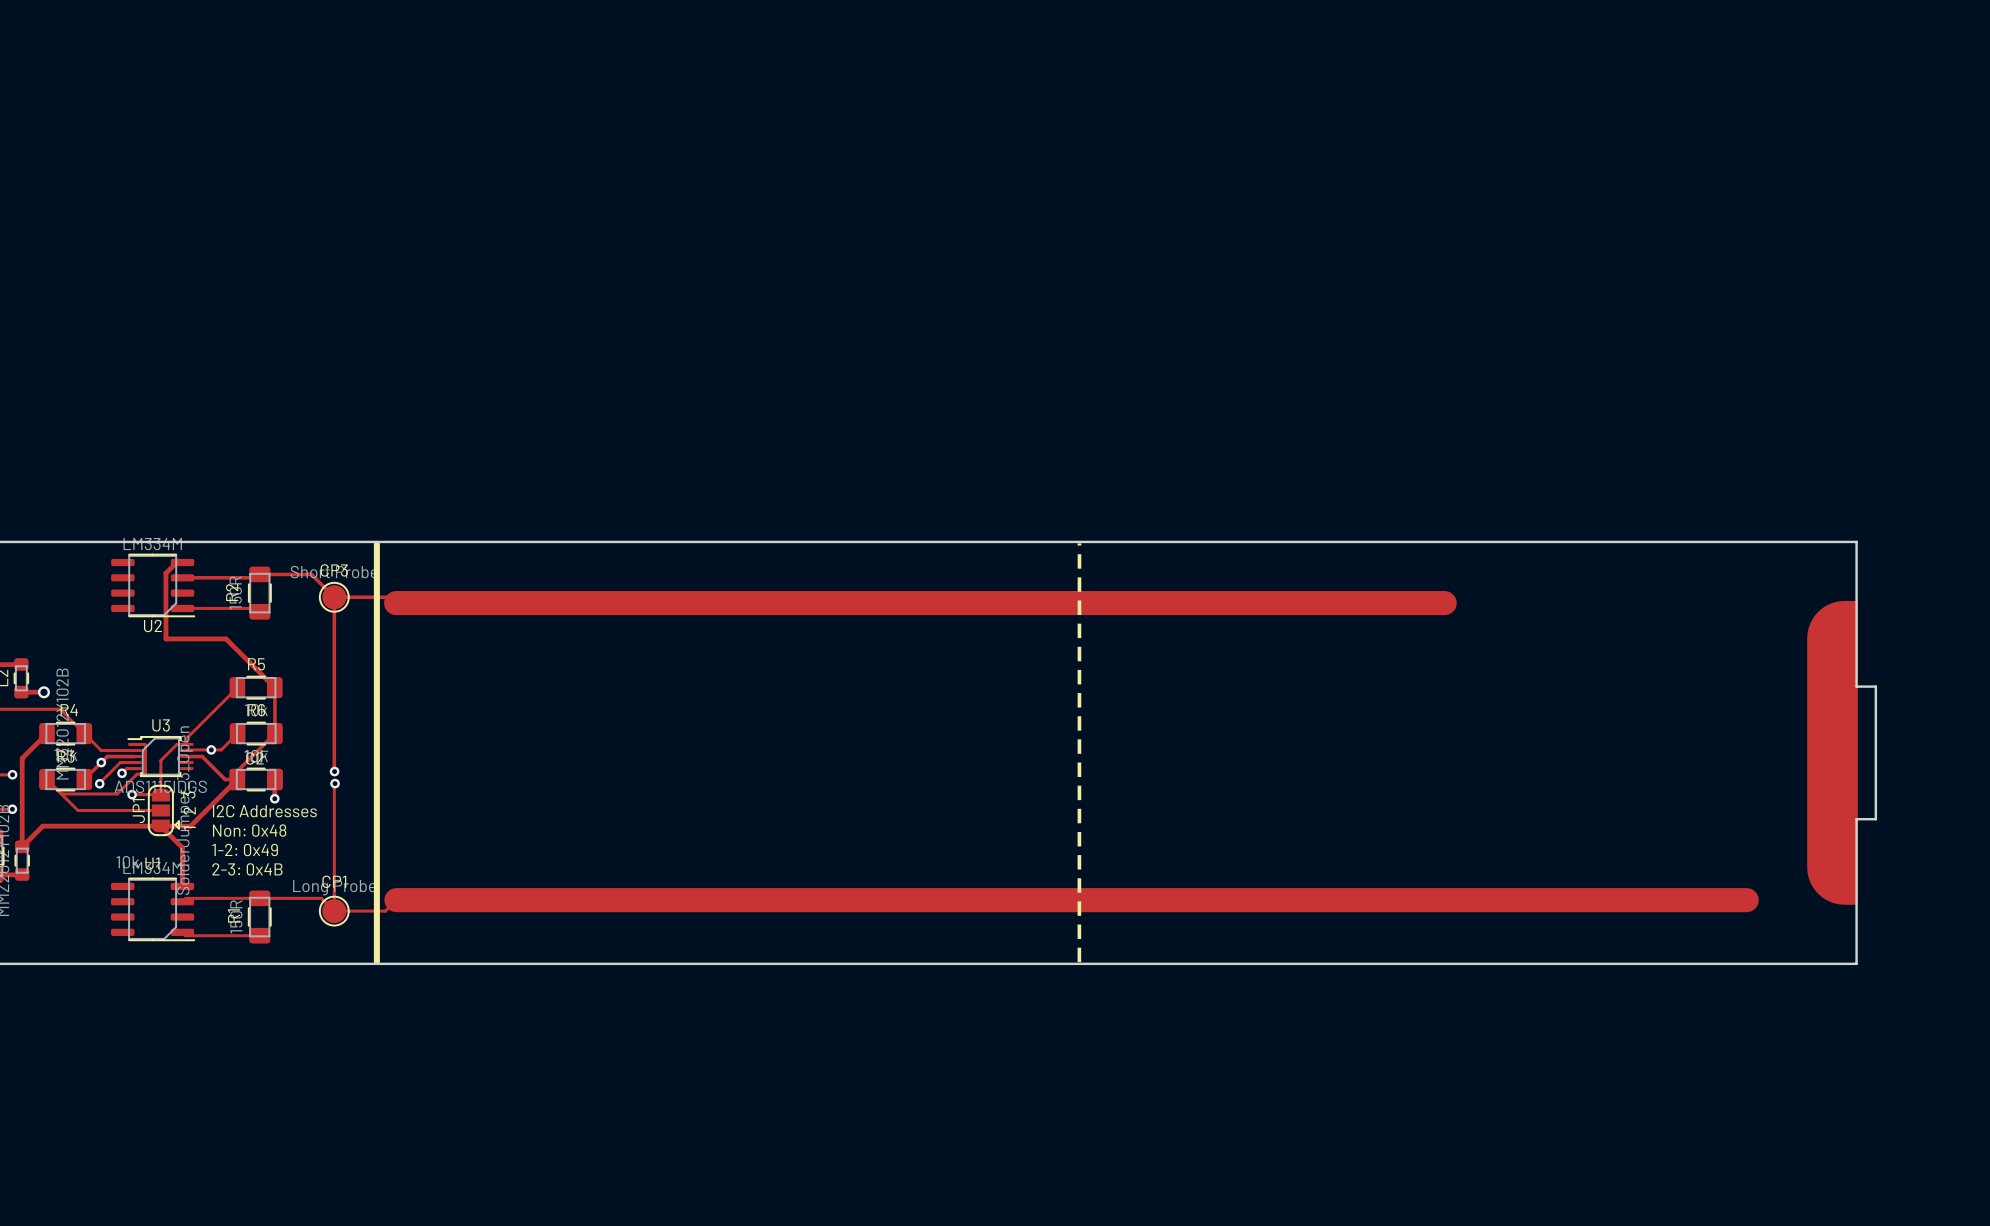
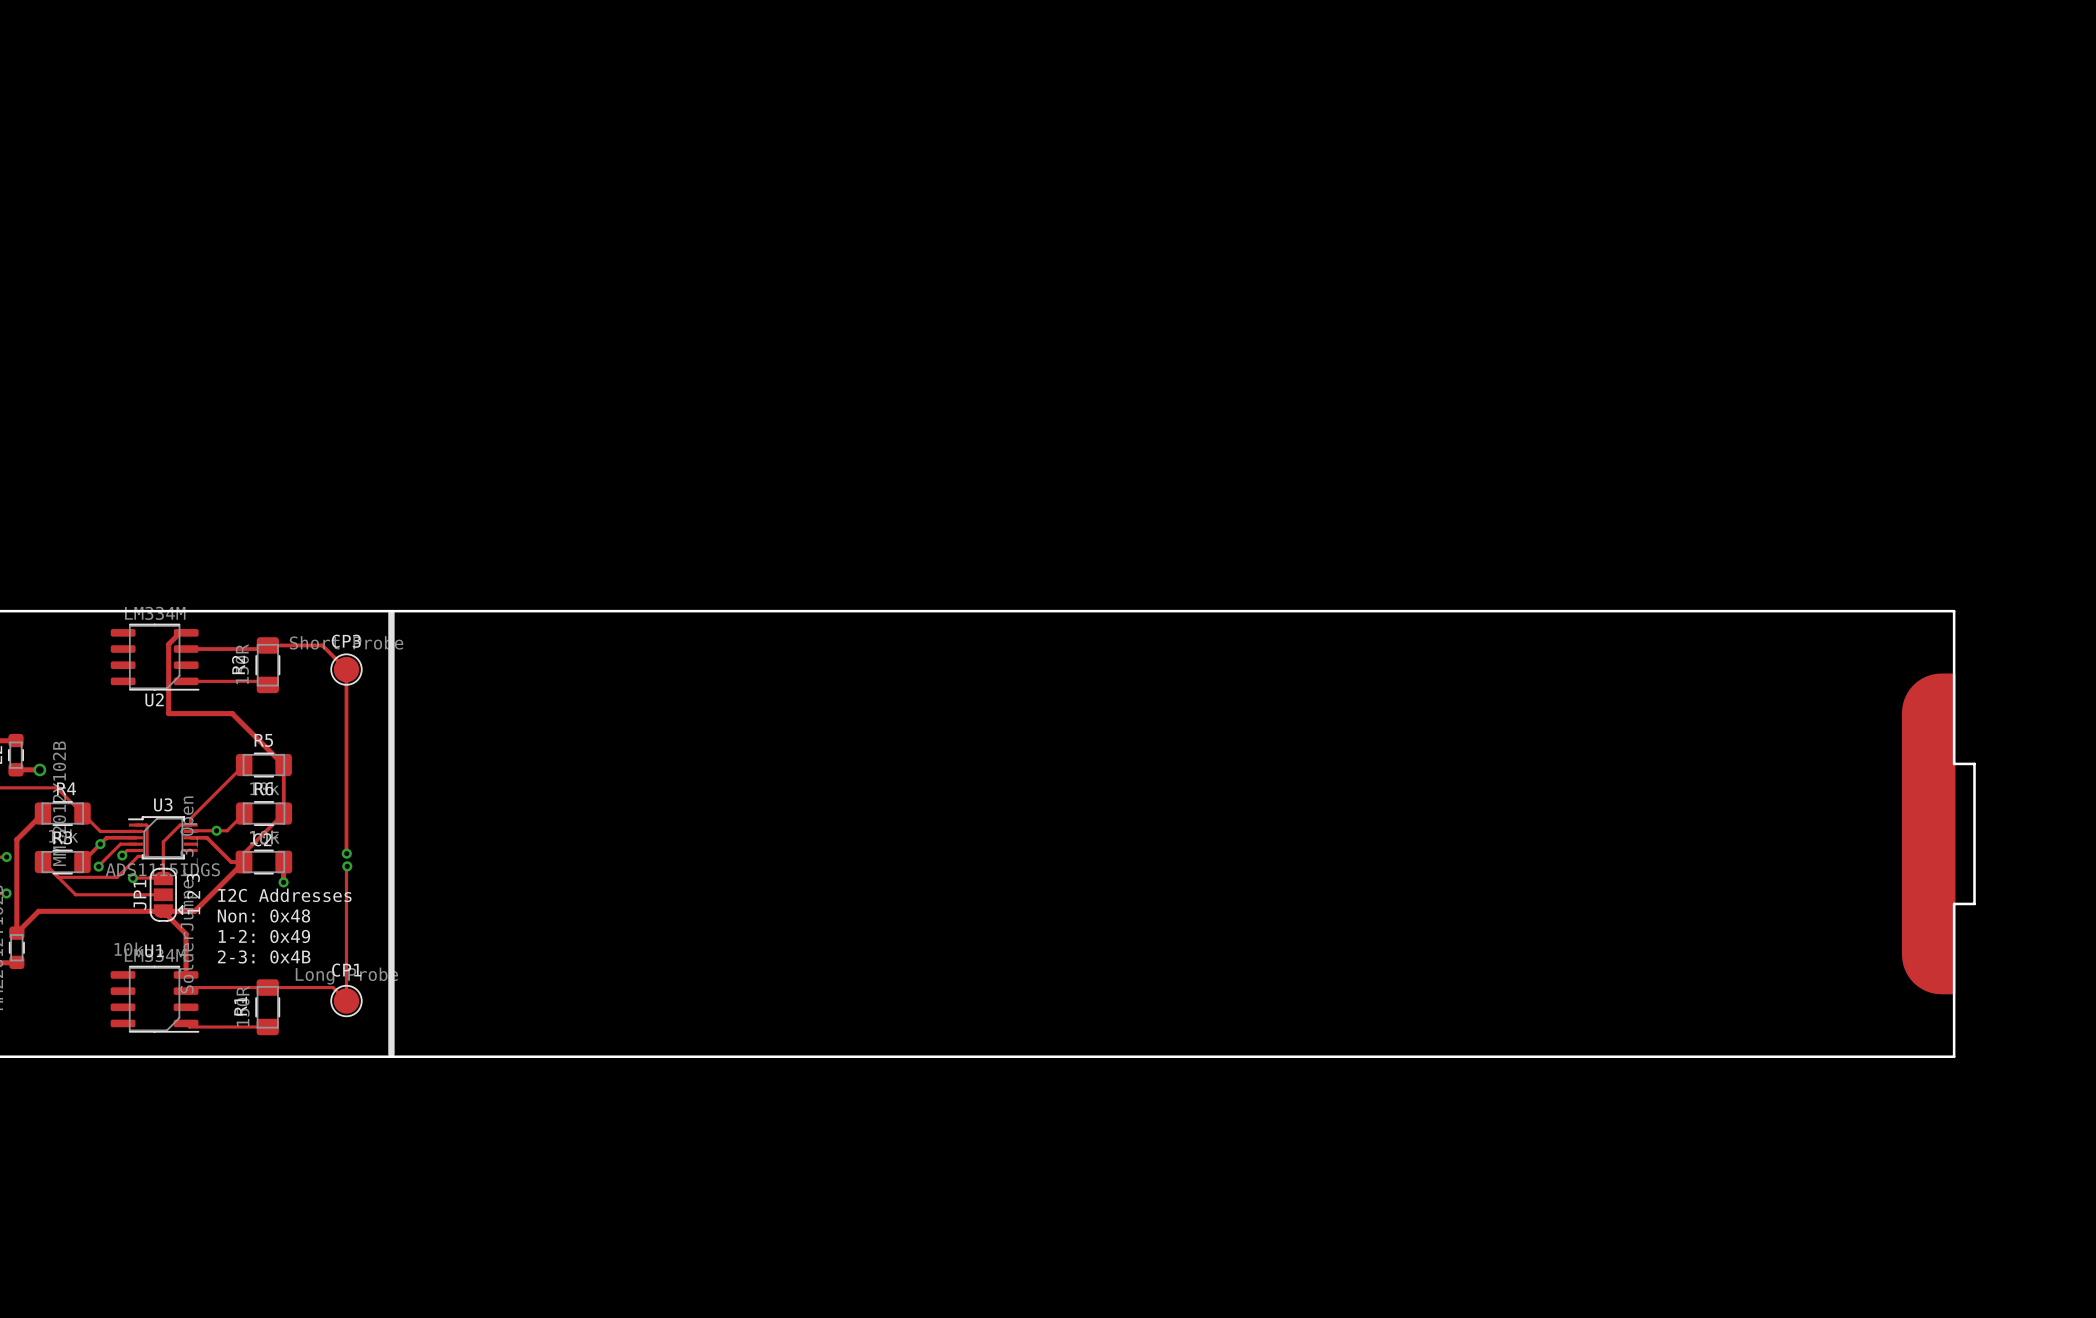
line: (1079, 543) (1079, 962) -> none
track: (334, 597) (390, 597) (396, 603) (1444, 603) -> none
track: (1746, 900) (396, 900) (385, 911) (334, 911) -> none

